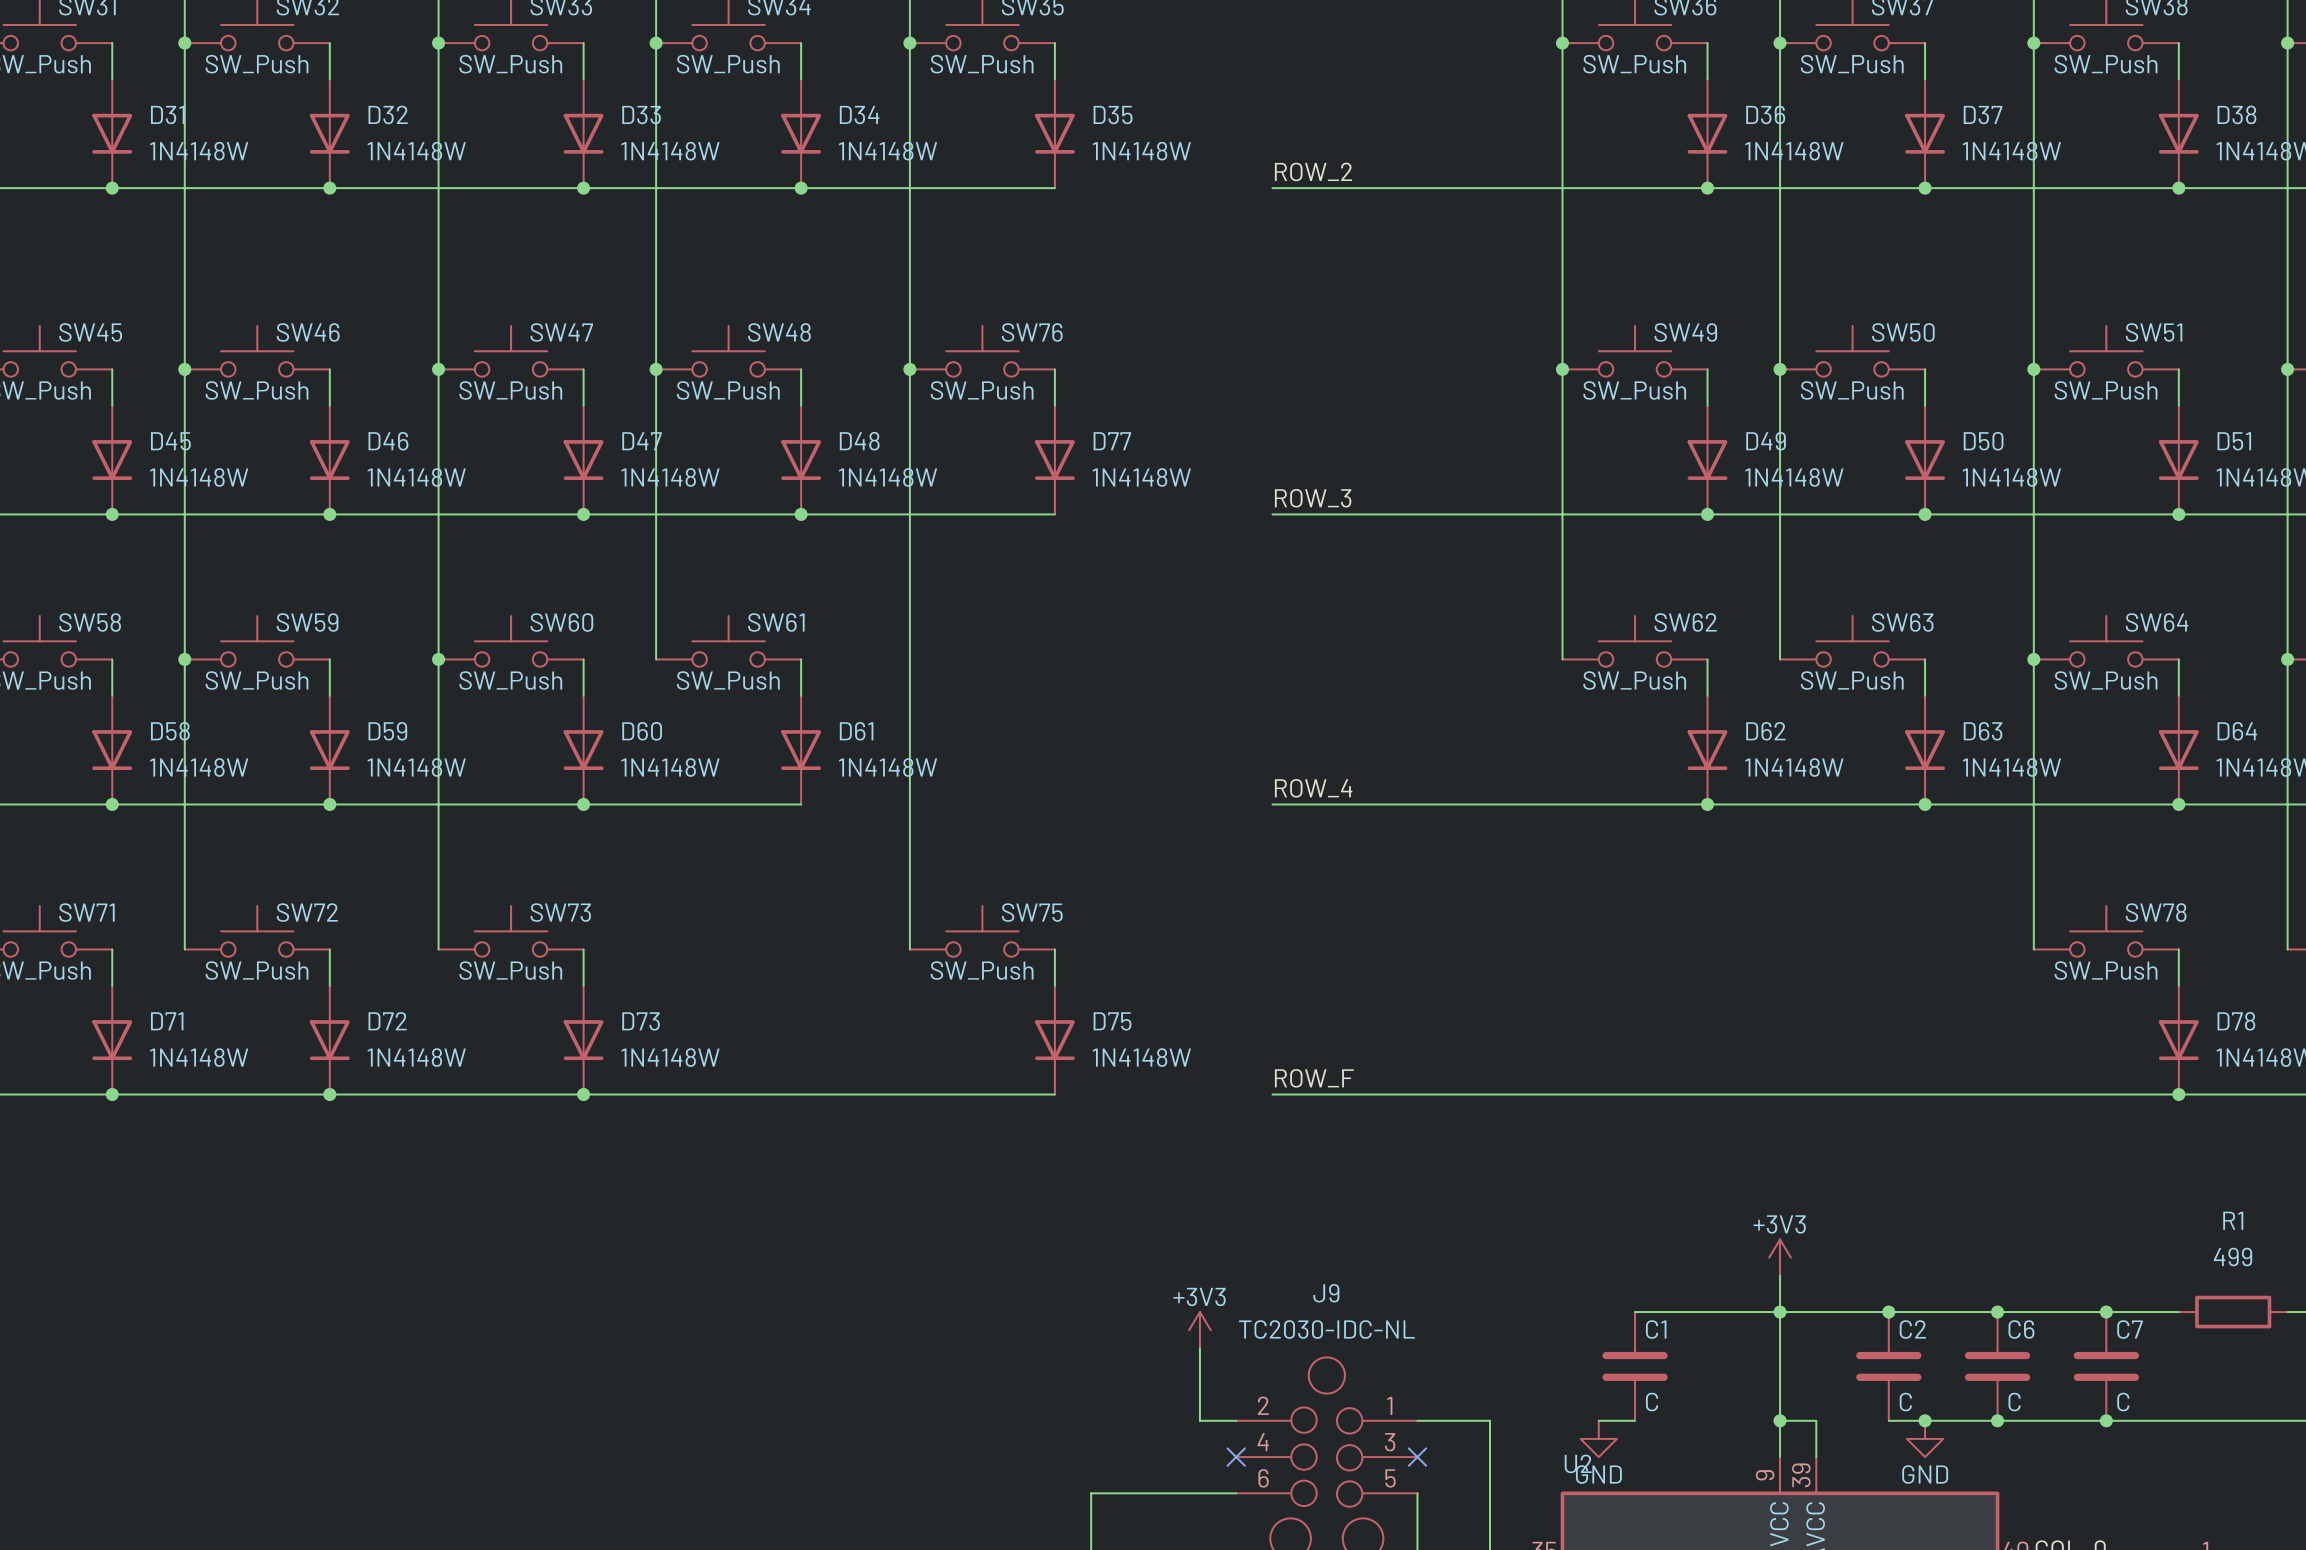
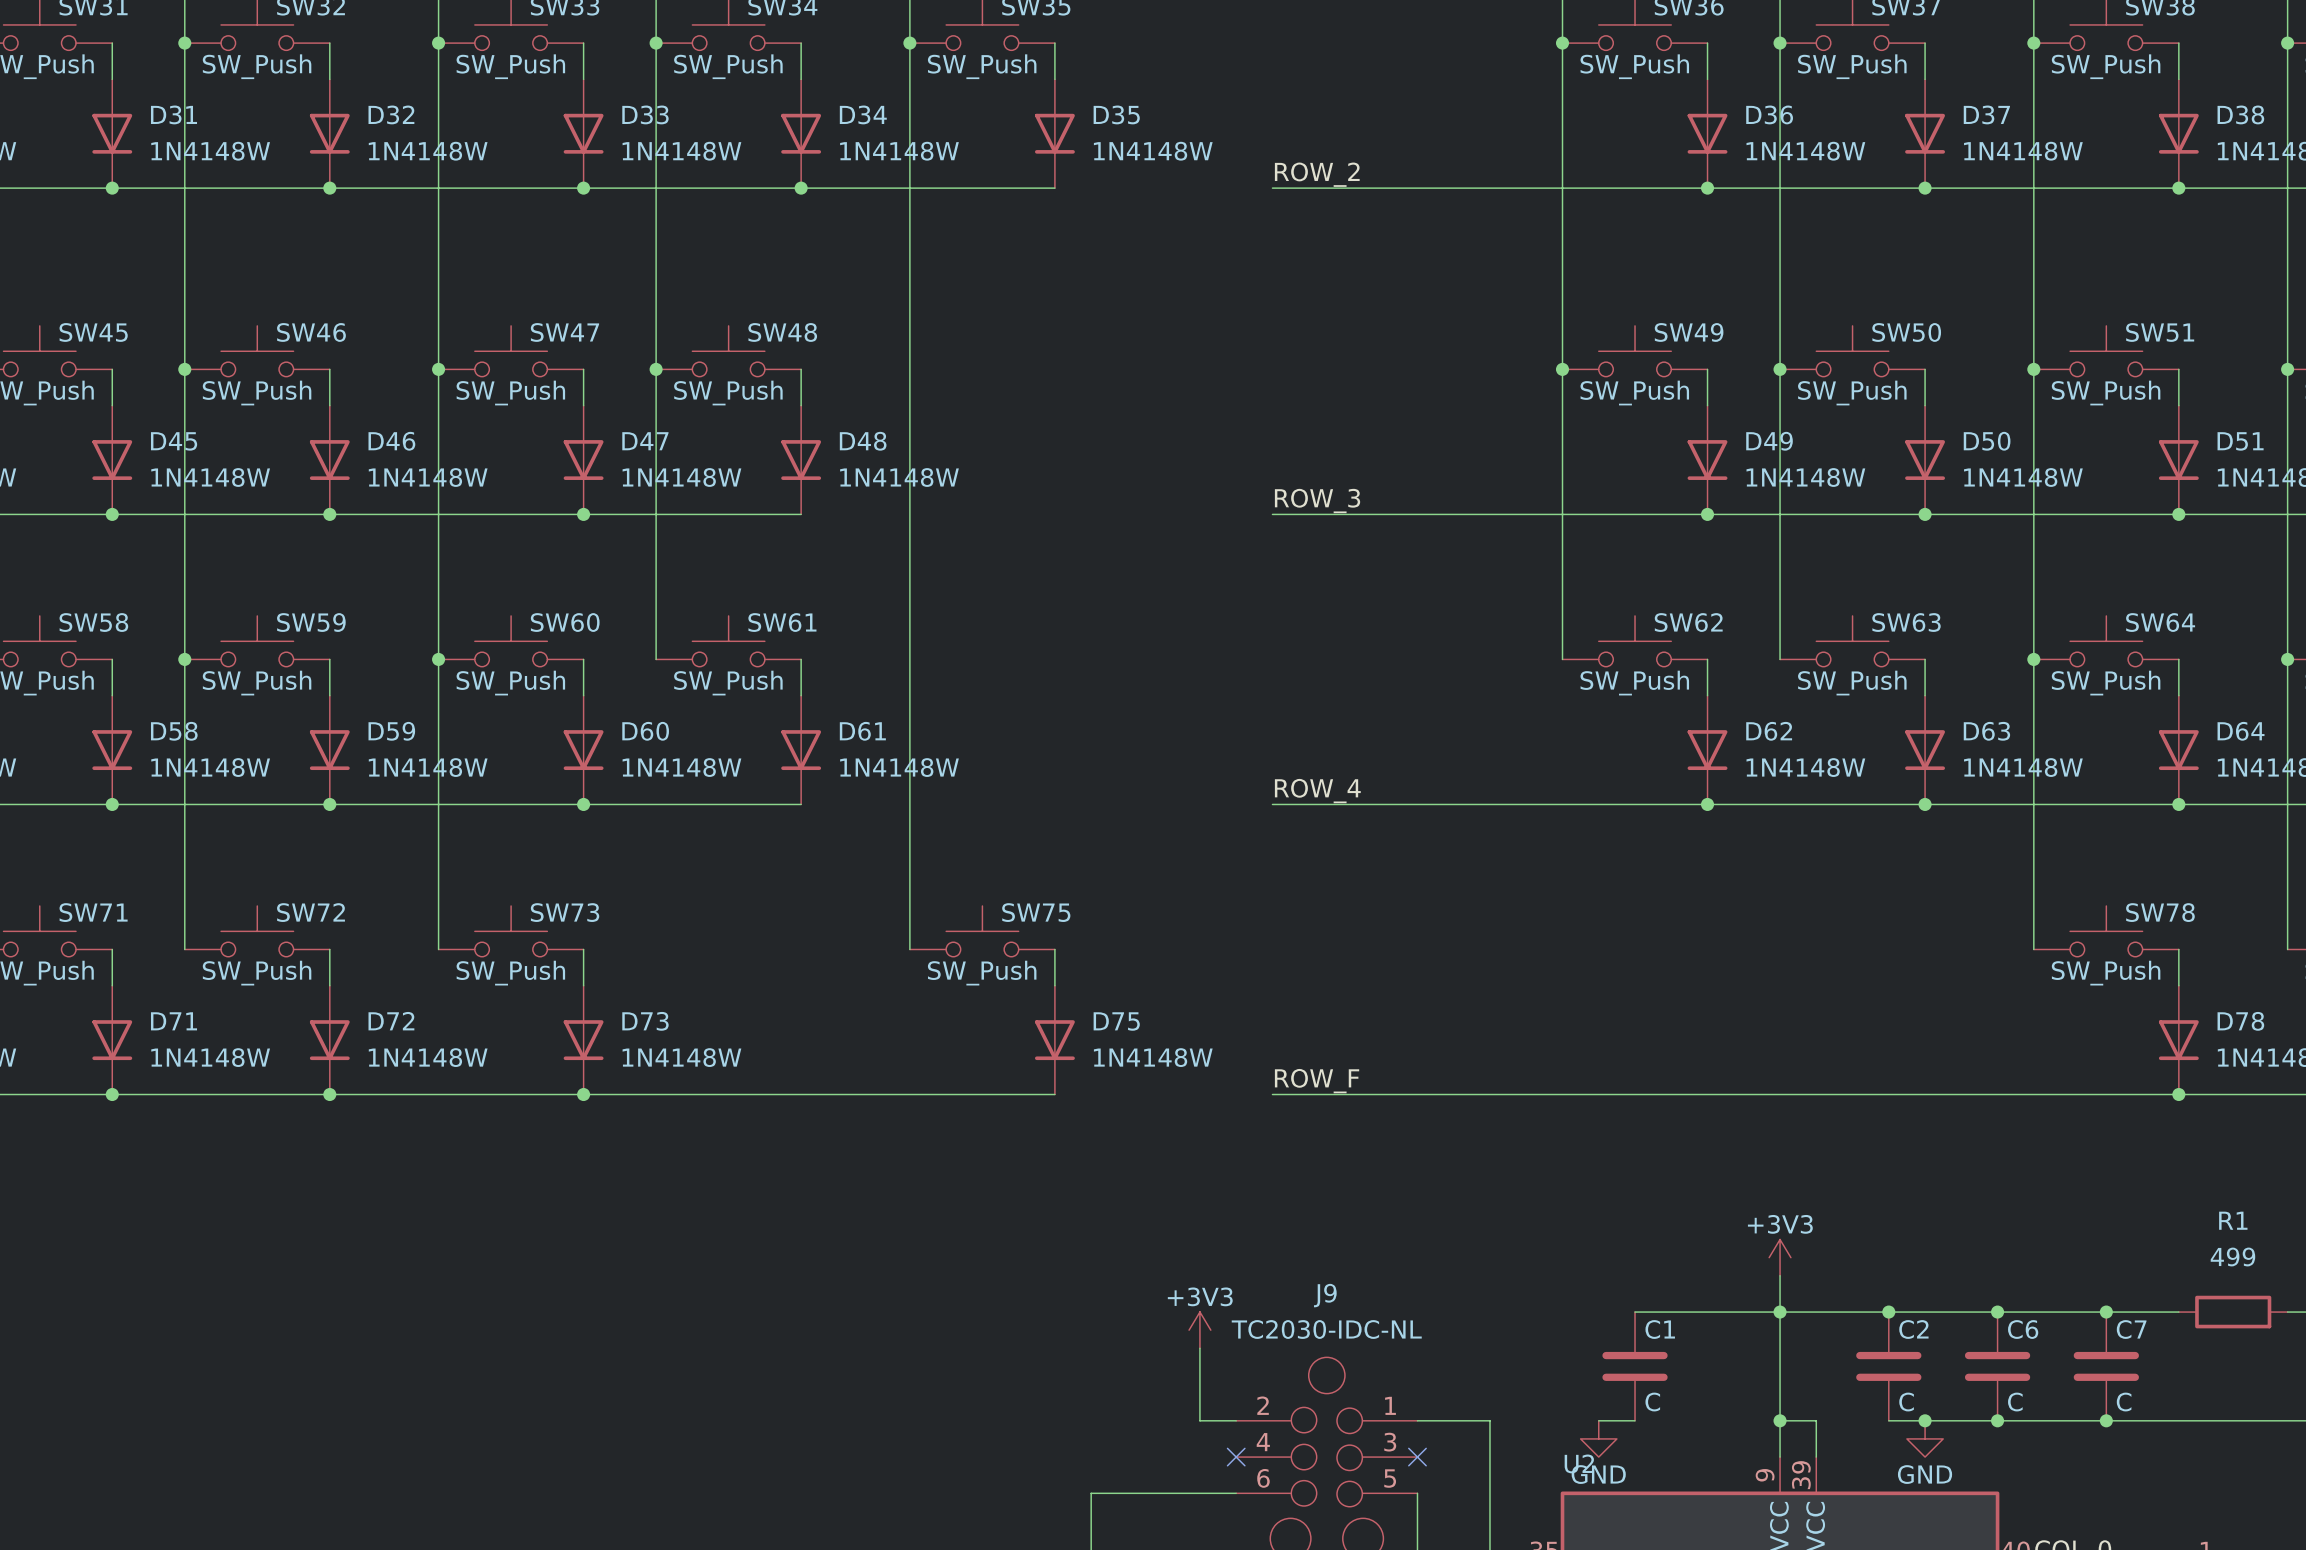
SW76: SW_Push (982, 351) -> none
junction: (909, 369) -> none
wire: (1054, 369) (1054, 405) -> none
D77: 1N4148W (1054, 460) -> none
wire: (801, 514) (1054, 514) -> none
junction: (801, 514) -> none

